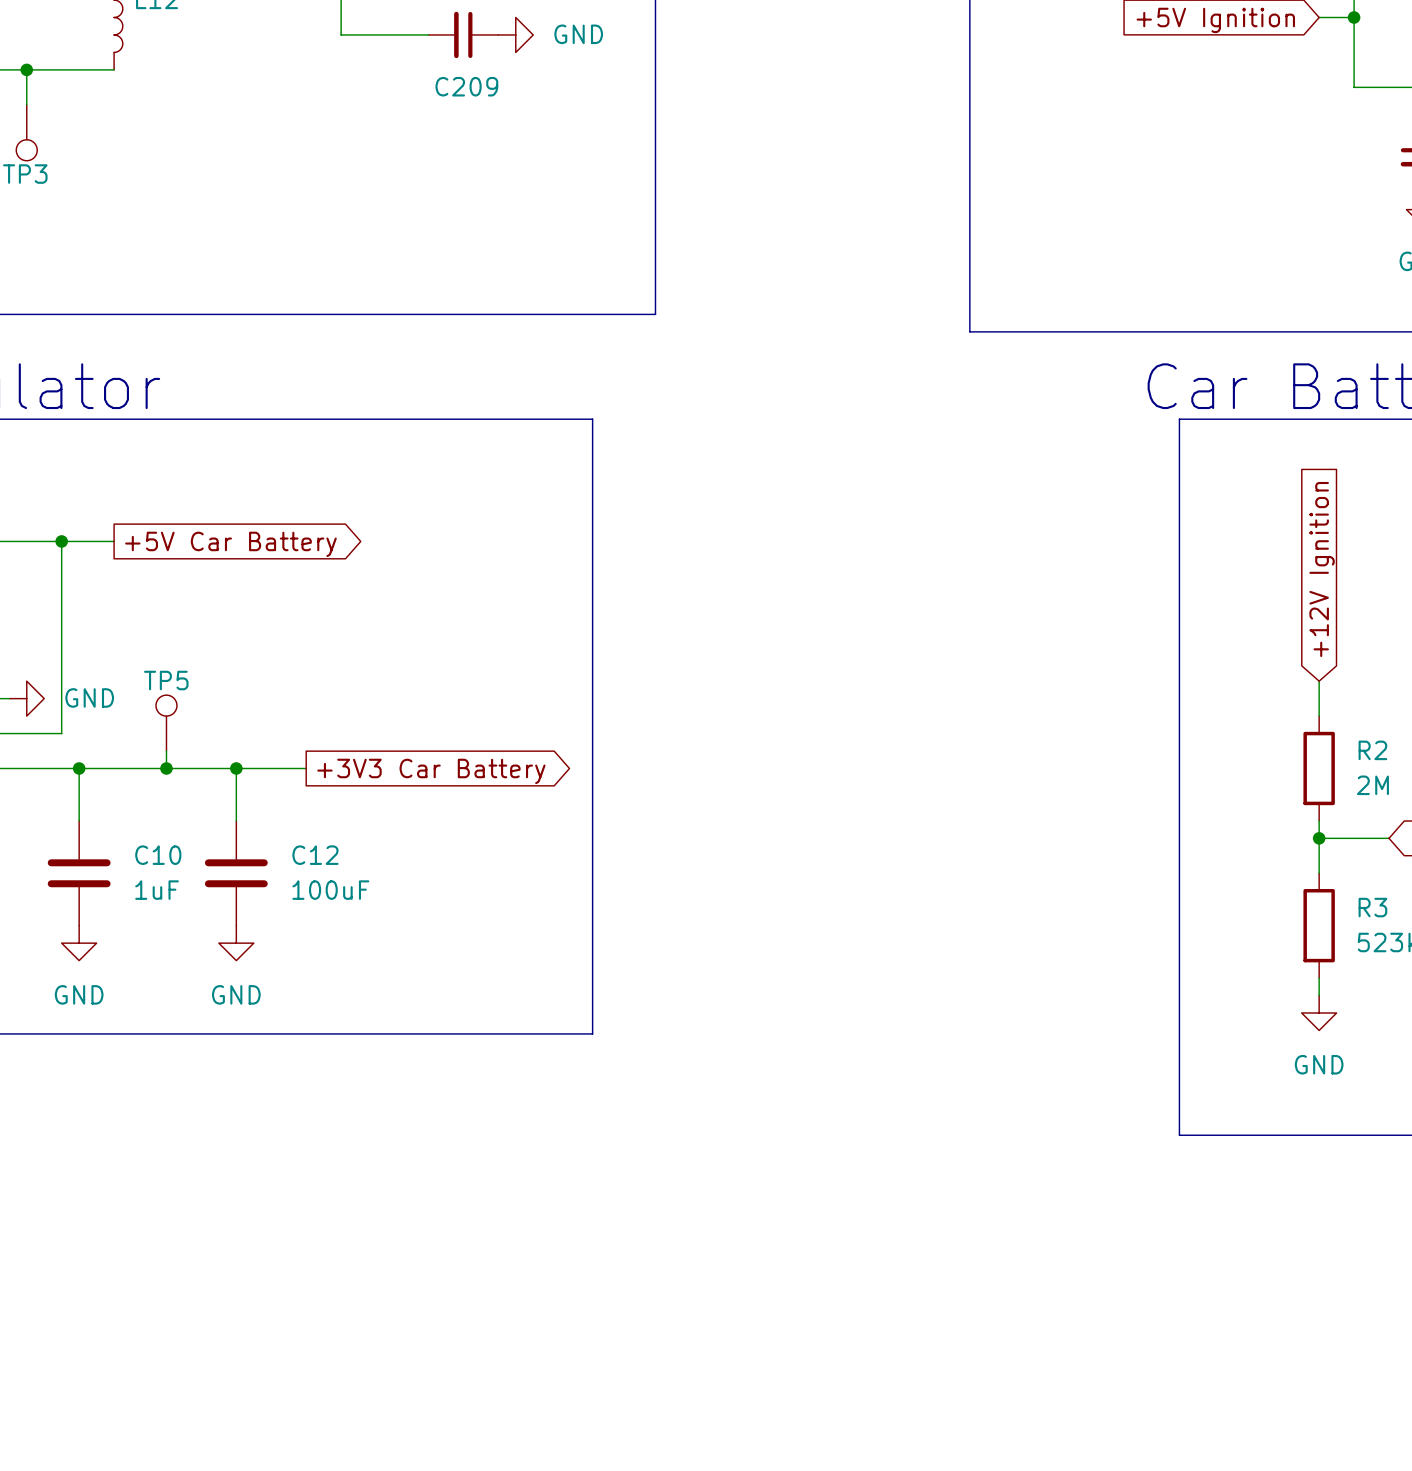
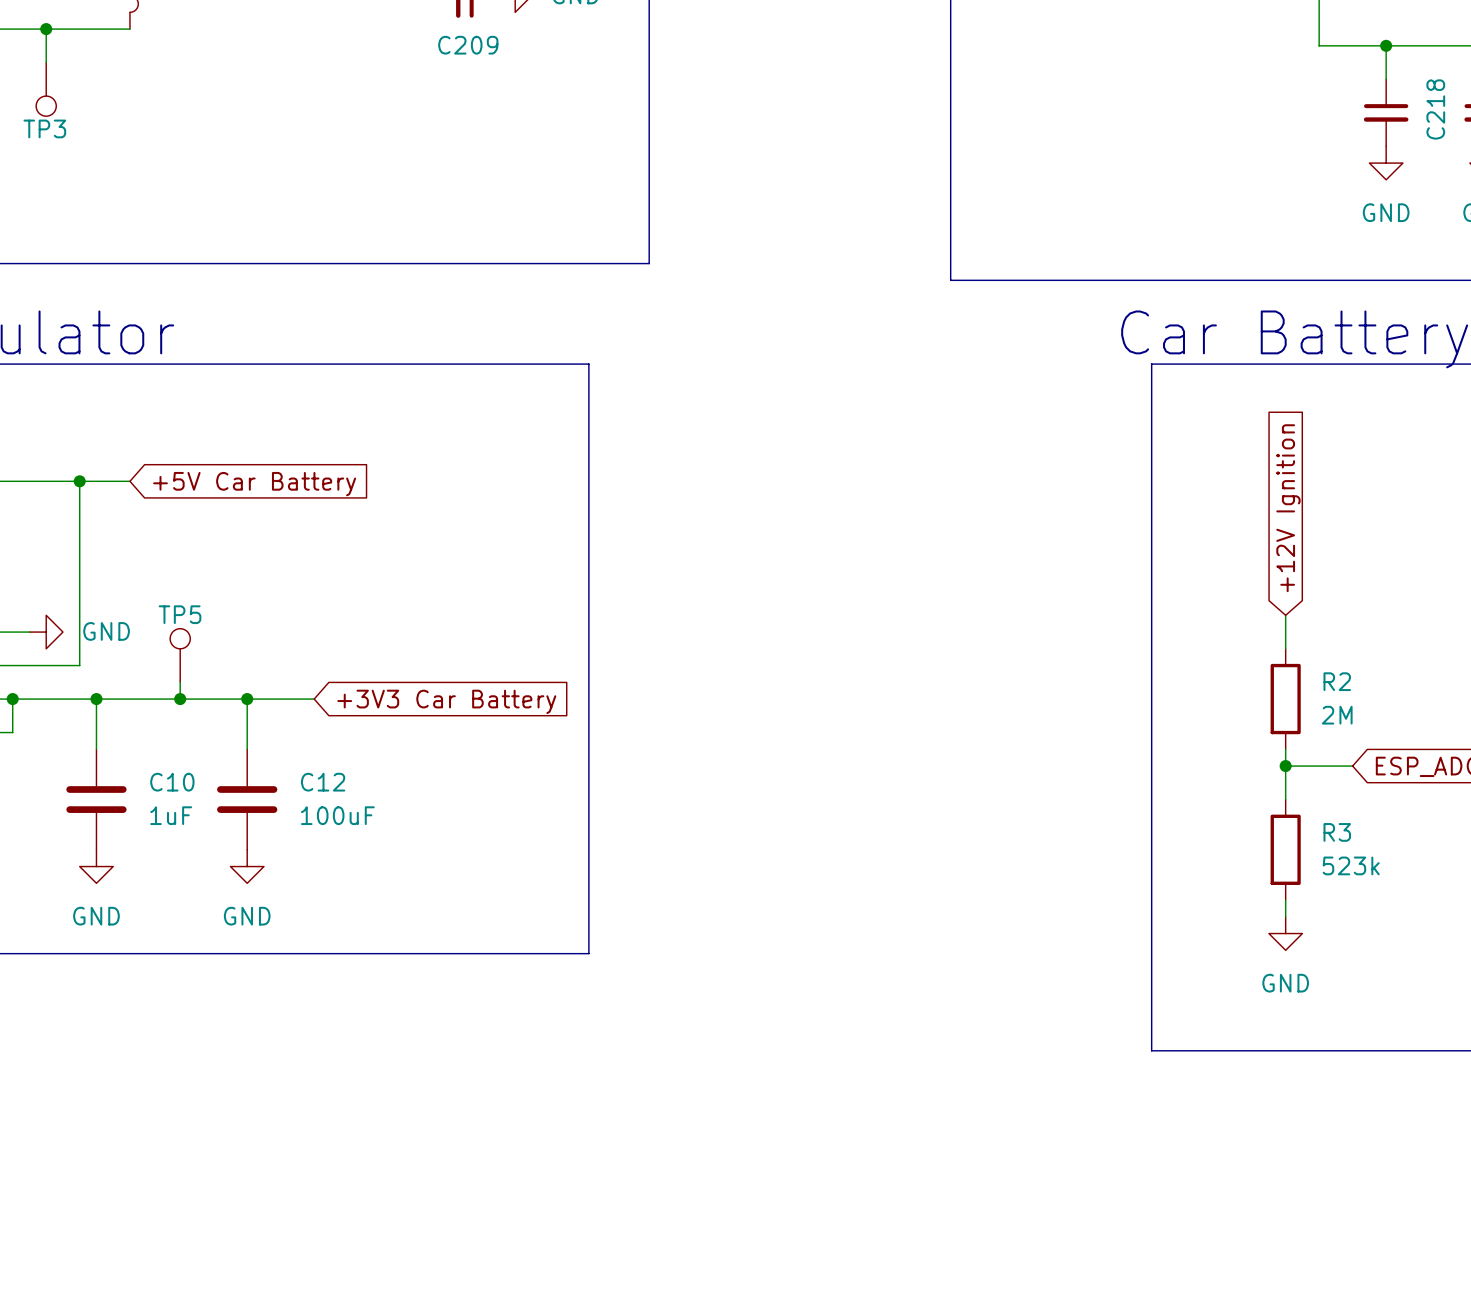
global label shape: output (230, 544) -> input (254, 484)
global label shape: output (431, 771) -> input (446, 701)

